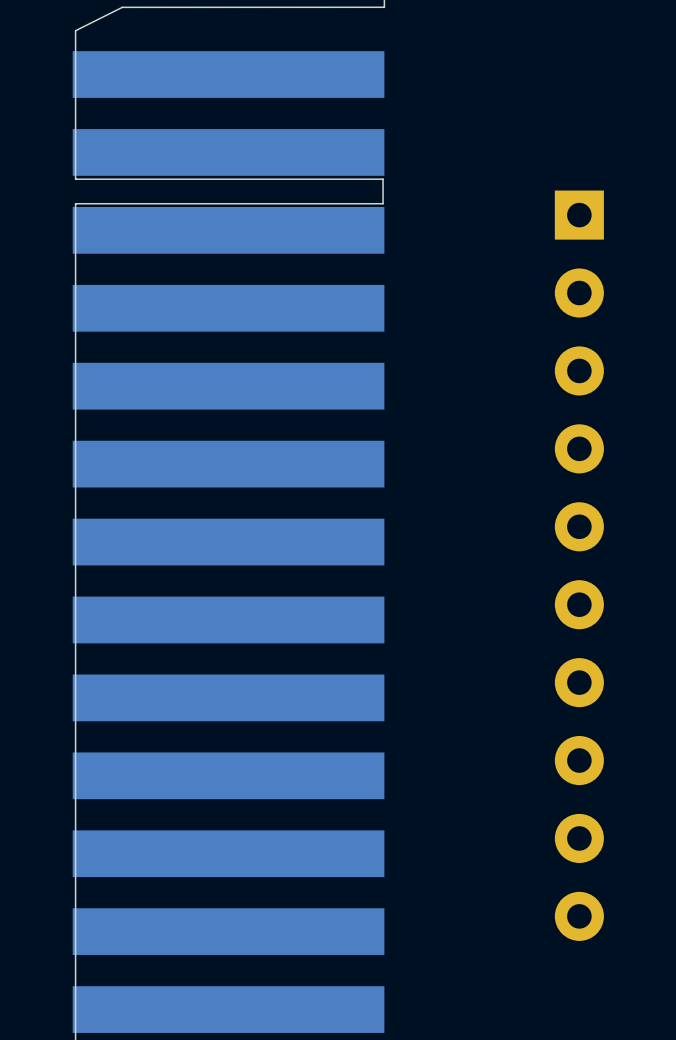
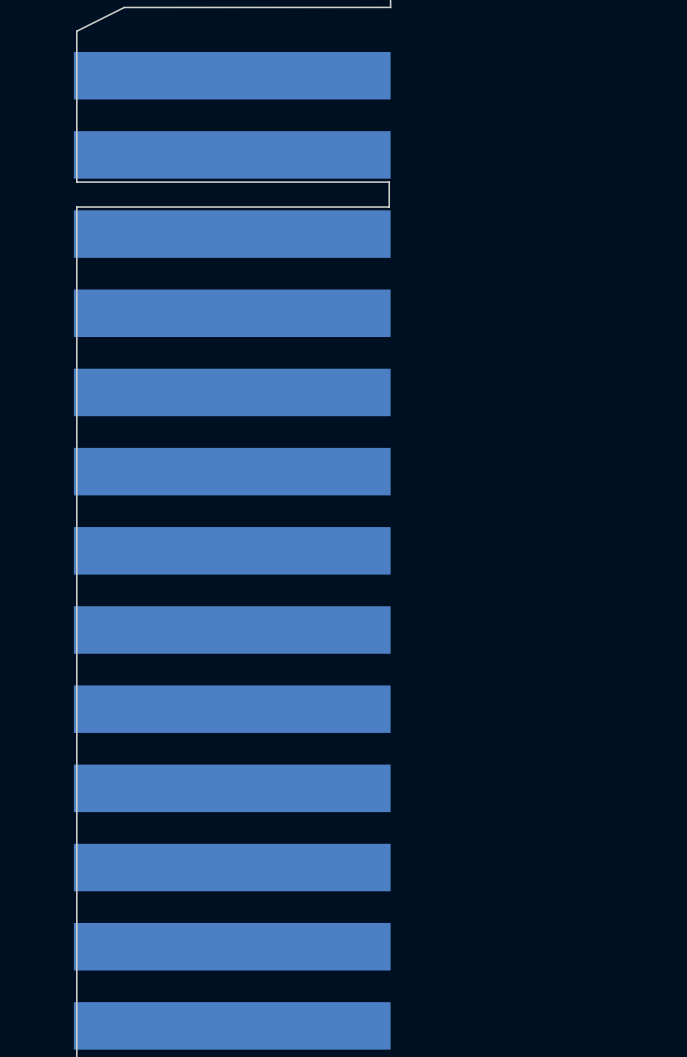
part: (579, 565) -> none

